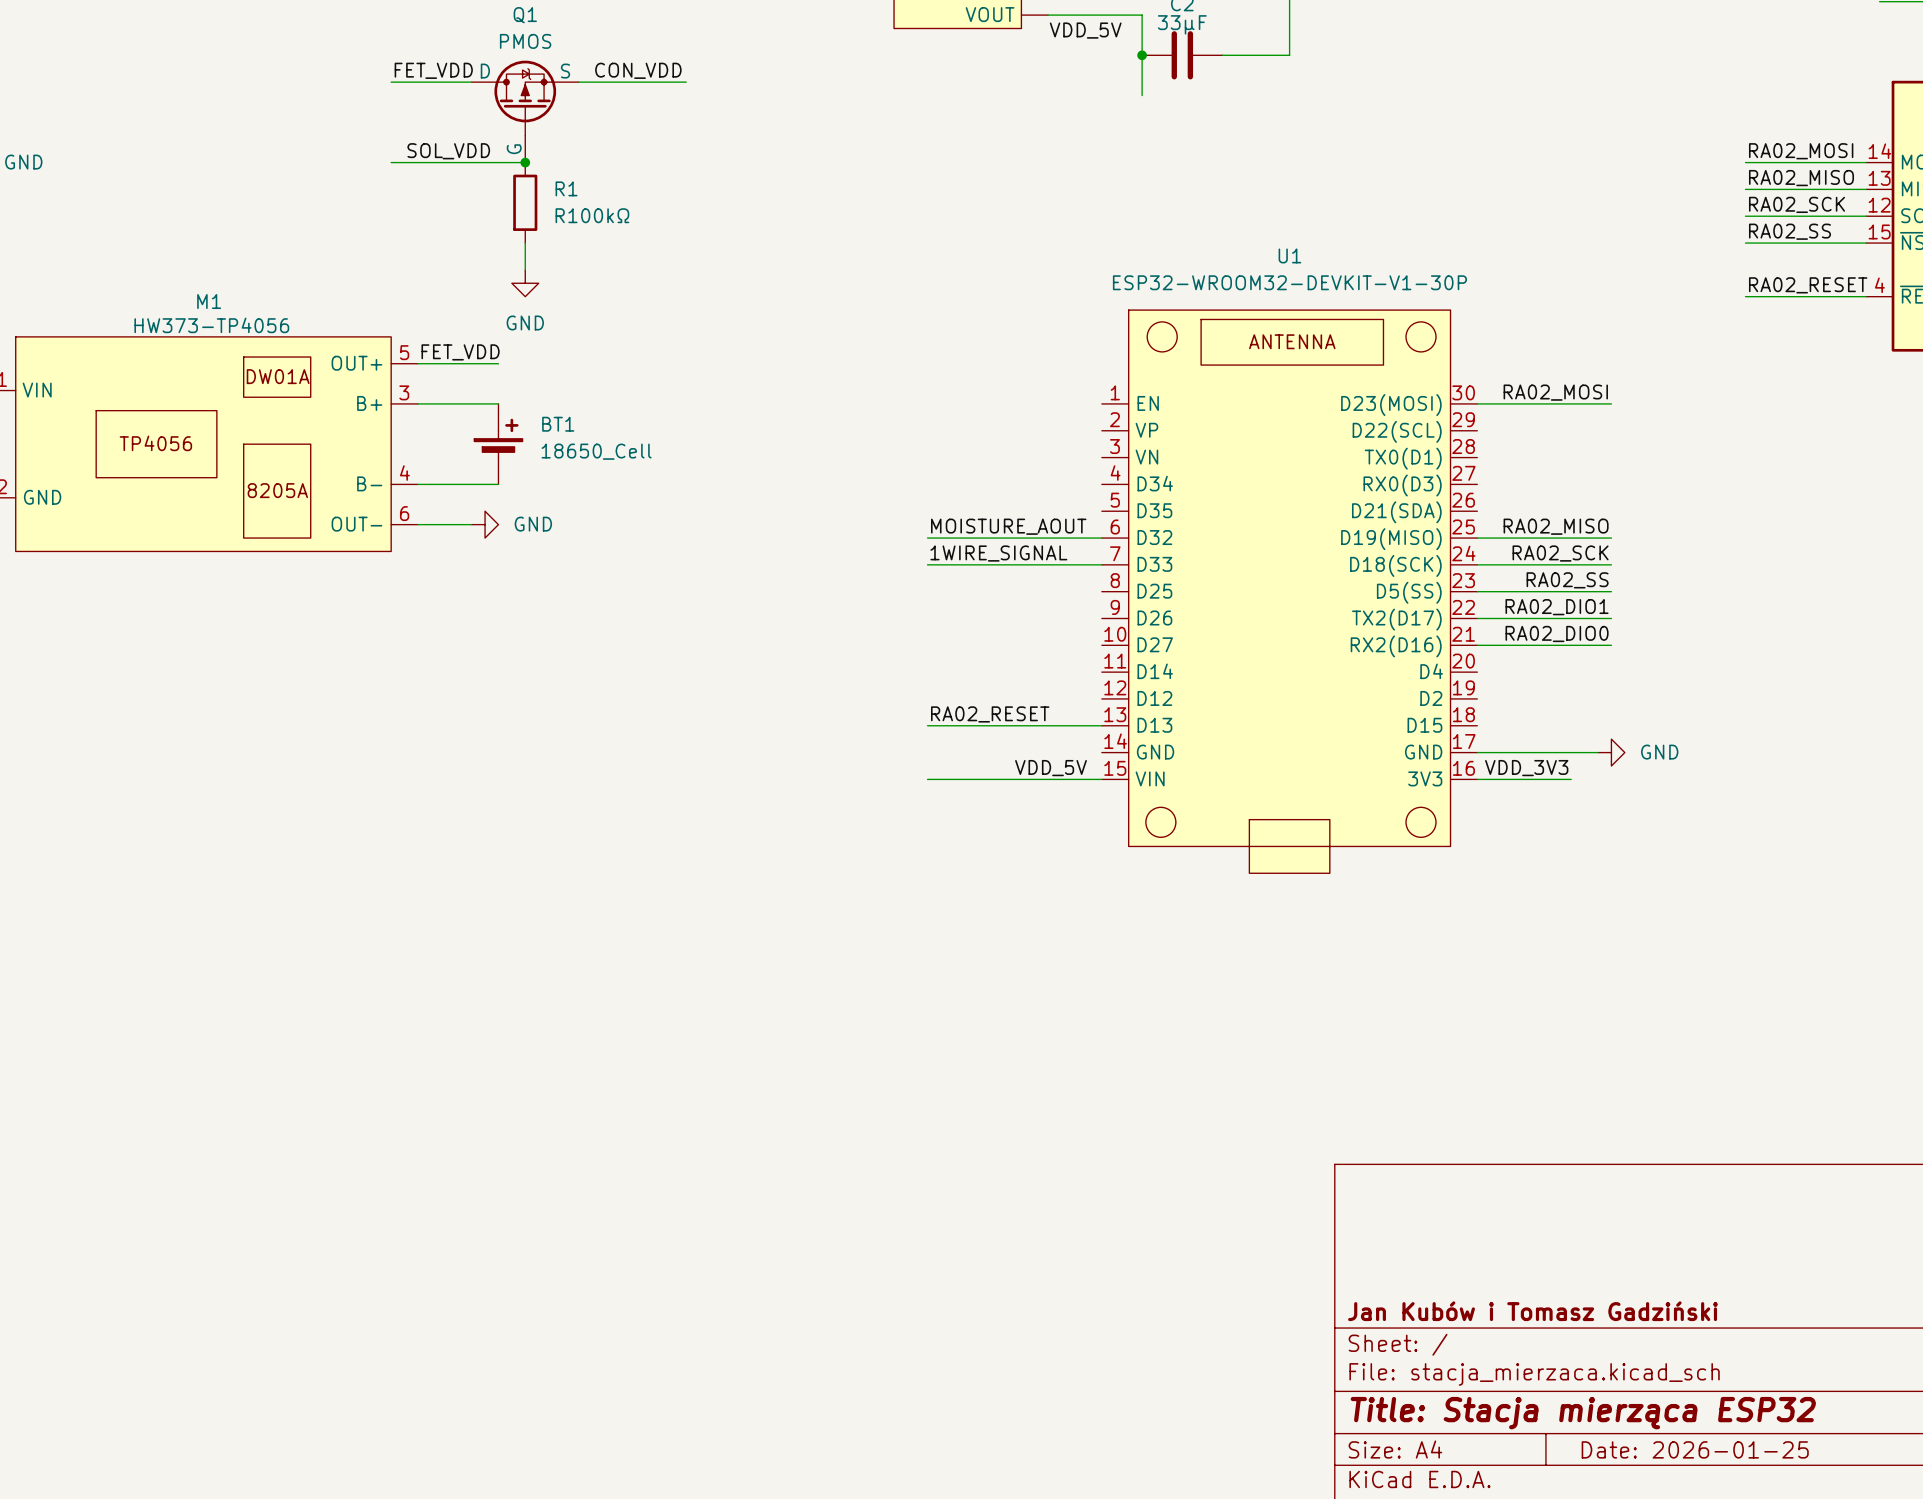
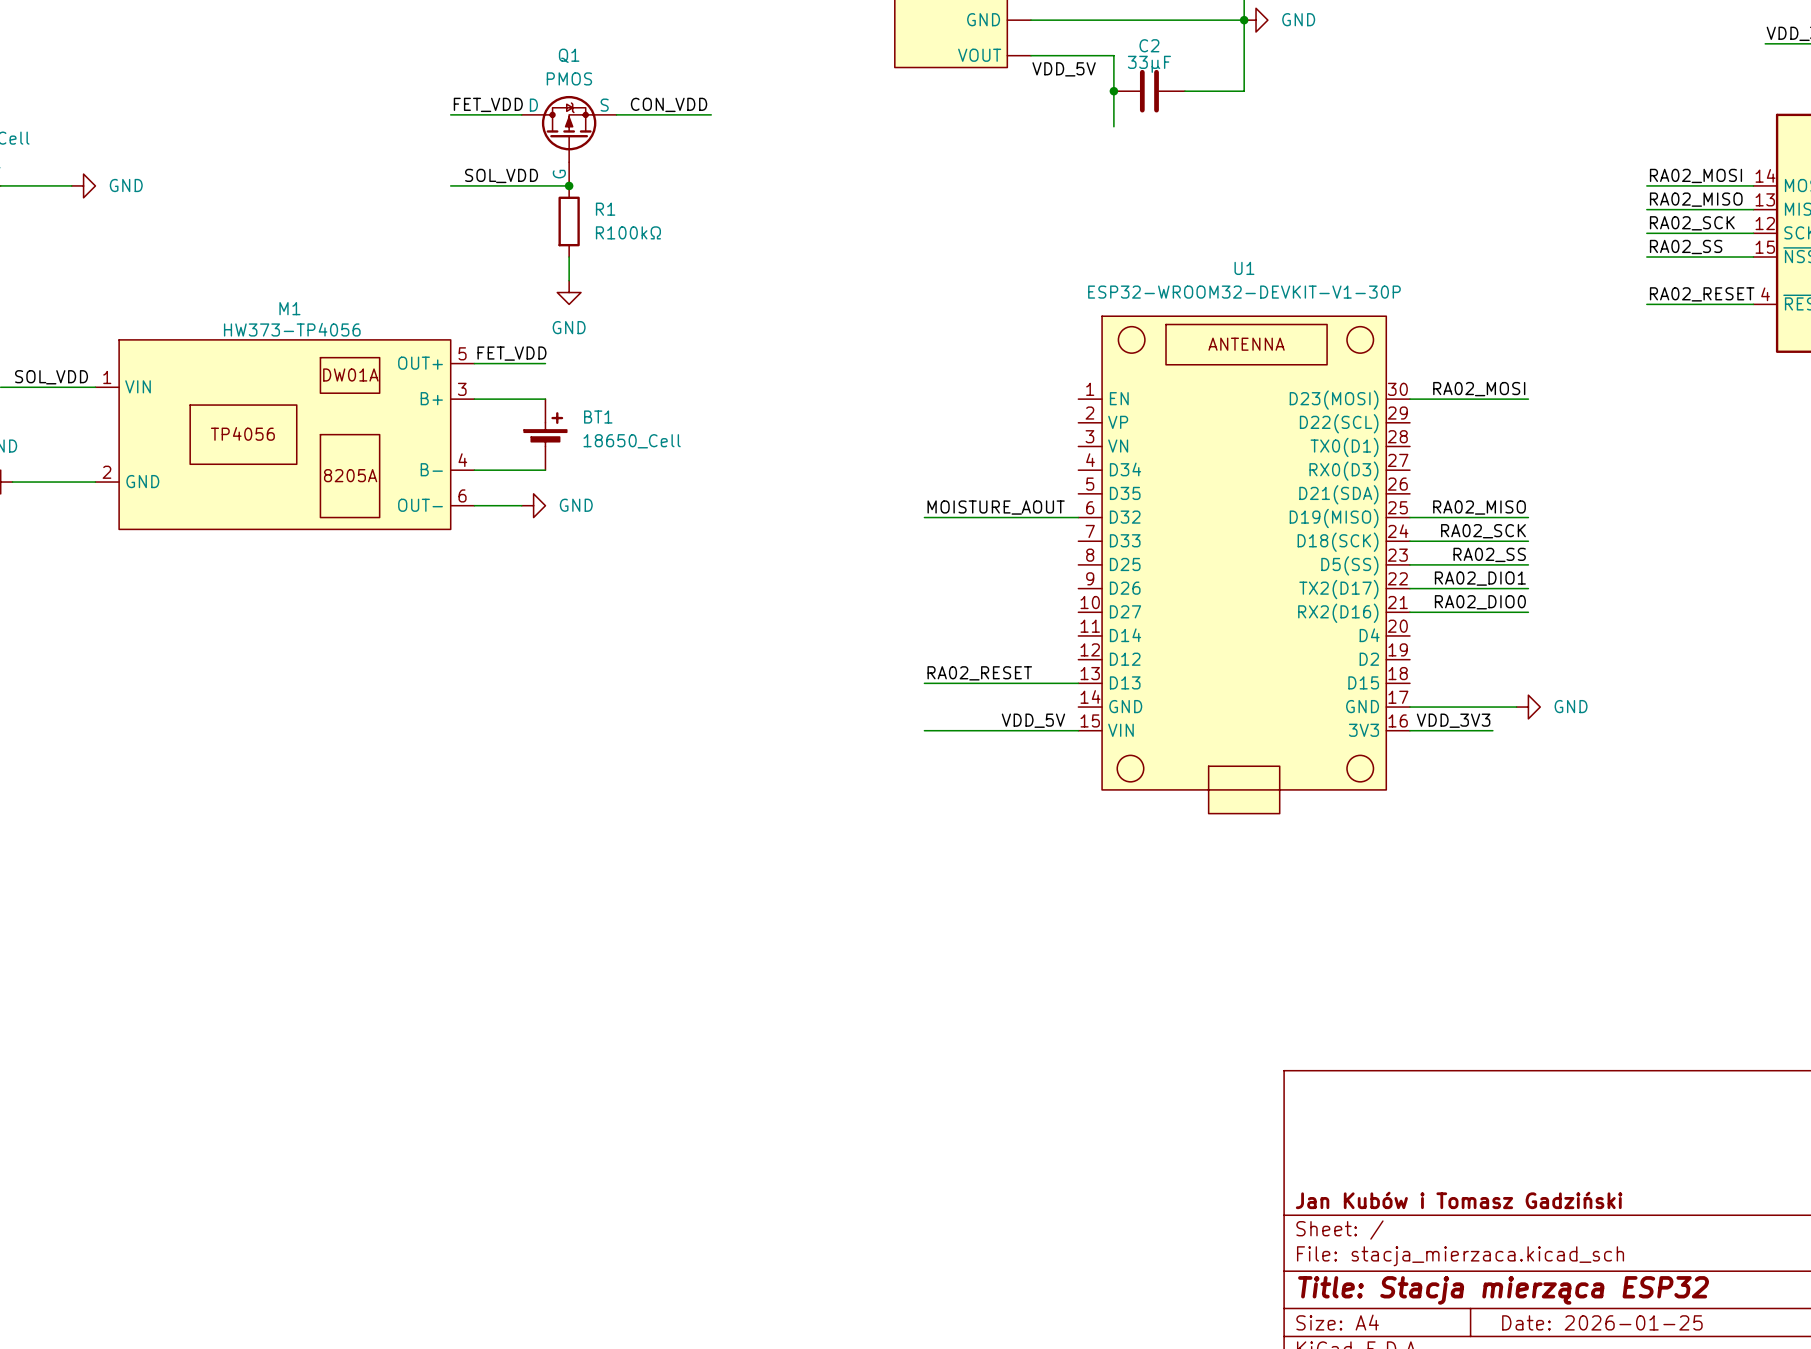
label: 1WIRE_SIGNAL (998, 553) -> none
wire: (927, 564) (1101, 564) -> none

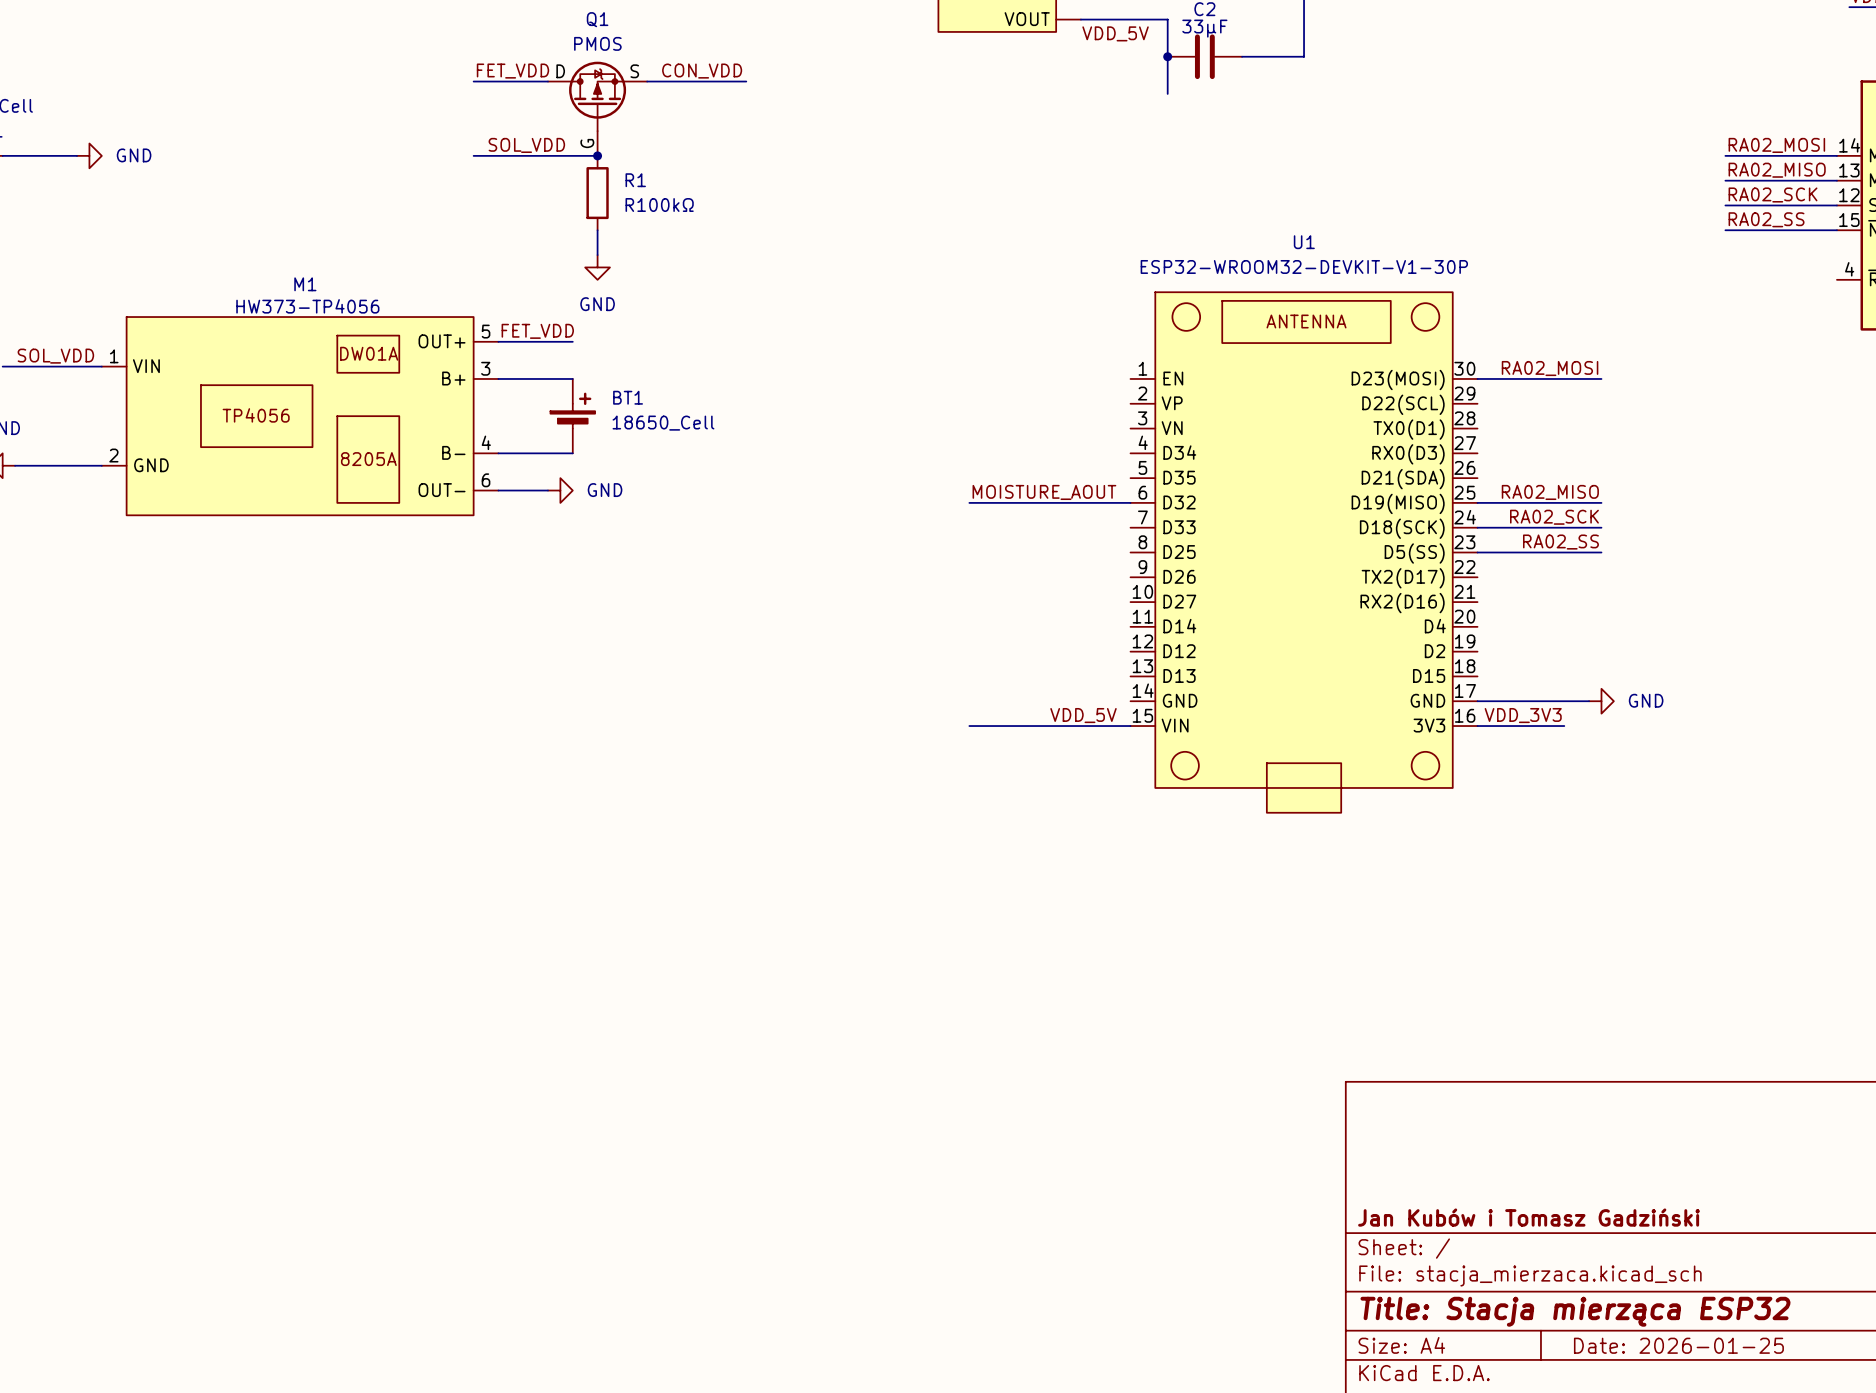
label: RA02_RESET (1702, 294) -> none
wire: (1646, 304) (1753, 304) -> none
label: RA02_DIO1 (1480, 578) -> none
wire: (1409, 588) (1528, 588) -> none
label: RA02_DIO0 (1480, 602) -> none
wire: (1409, 612) (1528, 612) -> none
label: RA02_RESET (979, 673) -> none
wire: (924, 683) (1078, 683) -> none

